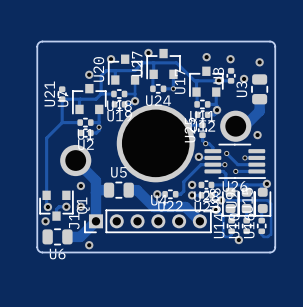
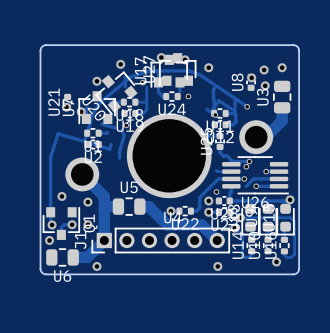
via: none -> (185, 59)
via: (206, 57) -> none
via: (230, 59) -> none
track: (153, 62) (152, 88) -> none
via: none -> (208, 67)
via: none -> (264, 69)
track: none -> (158, 70) (158, 92) (163, 97)
U20 rotation: 0° (125, 69) -> 39.4° counterclockwise (116, 93)
U20 position: (125, 69) -> (116, 93)
via: none -> (251, 77)
track: (173, 74) (173, 88) (163, 88) -> none
track: none -> (180, 82) (180, 91)
via: none -> (142, 82)
via: (218, 80) -> none
track: (231, 80) (194, 80) (176, 62) (142, 62) (134, 70) (106, 70) (101, 75) (101, 94) (95, 99) (62, 99) (62, 122) -> none
U17 position: (206, 81) -> (169, 71)
via: none -> (66, 107)
track: none -> (247, 106) (199, 74) (189, 70) (149, 70) (130, 77) (100, 102) (93, 112) (84, 141)
via: none -> (247, 106)
track: none -> (206, 109) (211, 112) (218, 100) (232, 109)
via: (135, 101) -> none
via: none -> (81, 111)
via: none -> (215, 115)
track: (99, 109) (99, 130) (96, 132) (90, 132) -> none
via: (217, 110) -> none
track: none -> (102, 124) (116, 128)
track: none -> (121, 129) (124, 135) (119, 158)
track: (62, 122) (46, 138) (46, 144) -> (111, 144) (109, 149) (58, 133) (50, 156)
track: (62, 122) (80, 122) -> none
via position: (99, 127) -> (126, 125)
via: (257, 135) -> none
via: (205, 143) -> none
track: none -> (249, 161) (234, 161) (231, 164)
via: none -> (249, 161)
track: (226, 153) (237, 164) -> (246, 186) (253, 178) (258, 178)
via: (198, 156) -> none
track: (212, 171) (223, 171) (225, 174) (225, 184) -> (231, 186) (229, 200)
via: none -> (216, 191)
via: none -> (61, 196)
via position: (238, 240) -> (276, 261)
via: none -> (217, 266)

